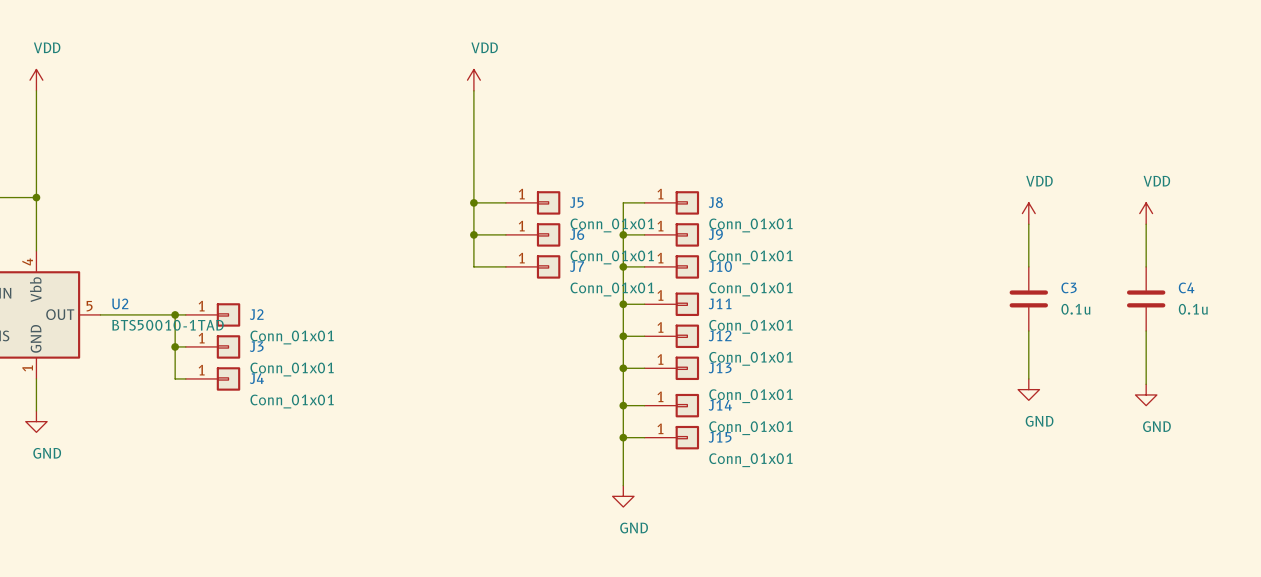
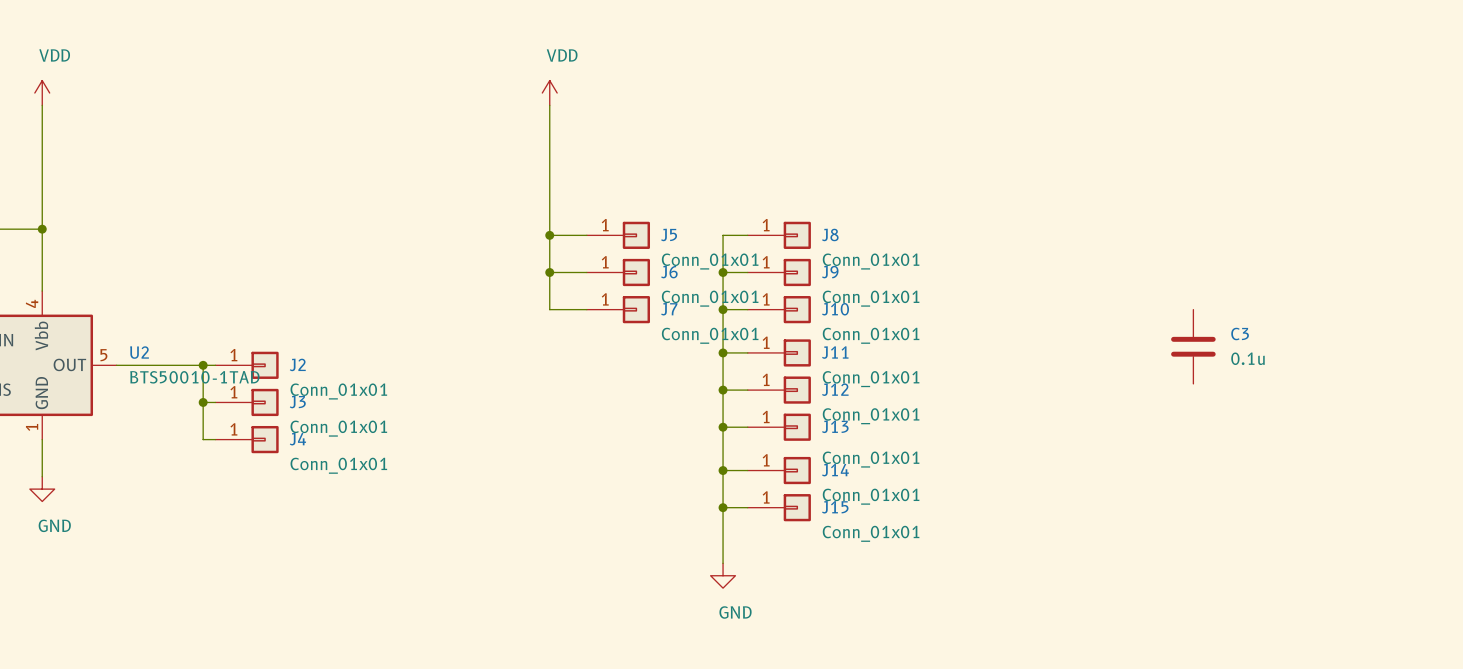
power symbol: VDD (1028, 213) -> none
power symbol: VDD (1146, 213) -> none
wire: (1028, 224) (1028, 266) -> none
wire: (1146, 224) (1146, 266) -> none
C4: 0.1u (1146, 298) -> none
wire: (1028, 330) (1028, 378) -> none
wire: (1146, 330) (1146, 384) -> none
power symbol: GND (1028, 389) -> none
power symbol: GND (1146, 394) -> none

